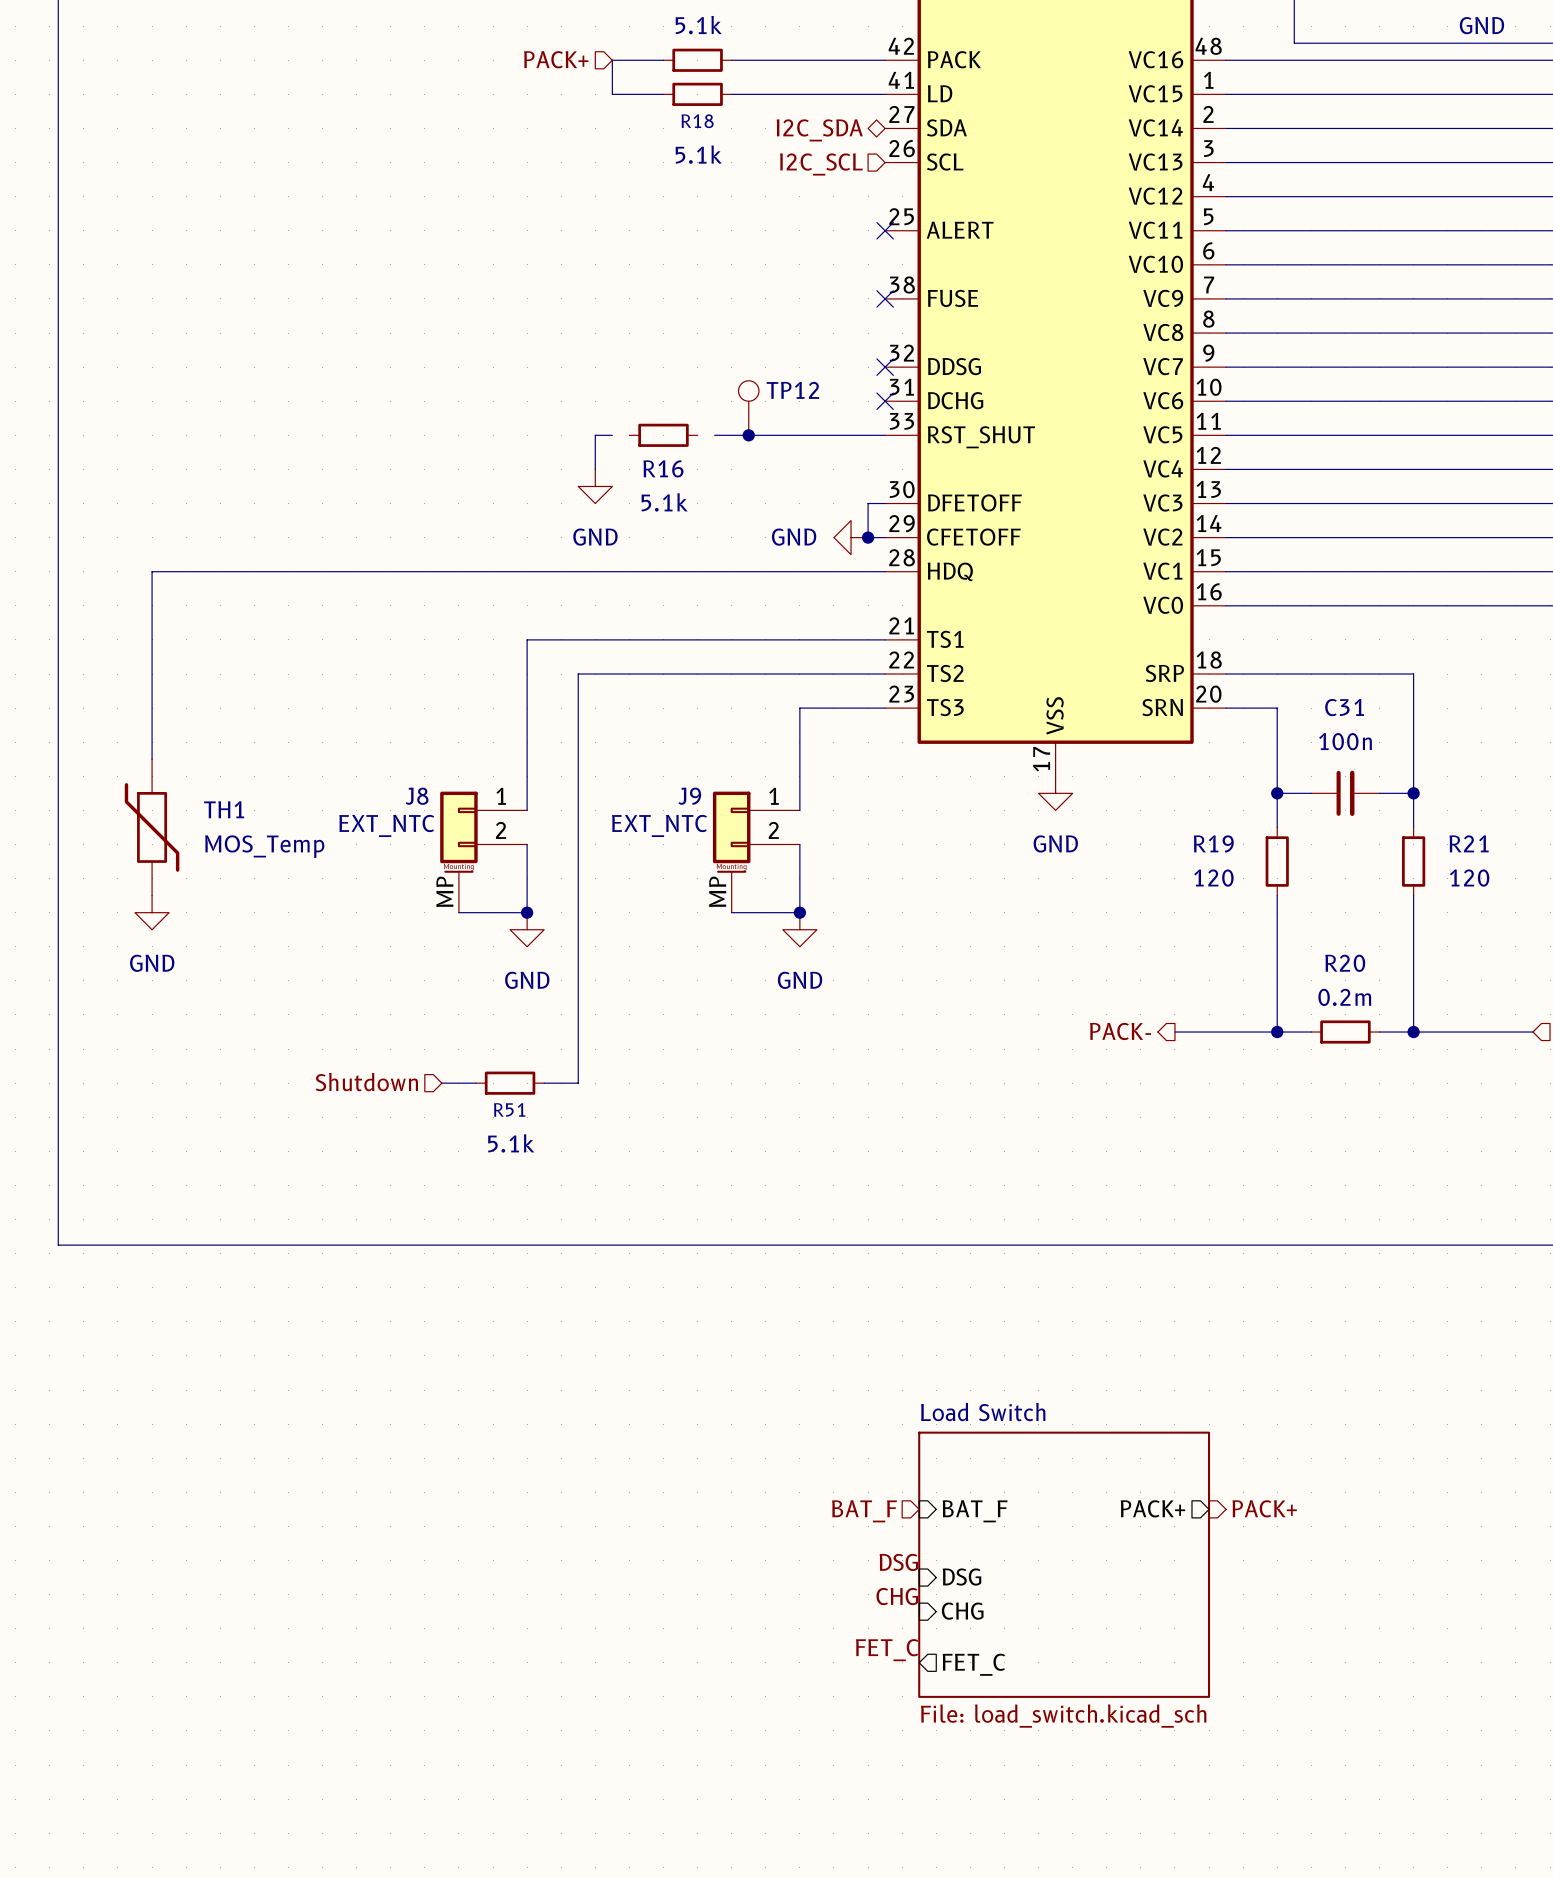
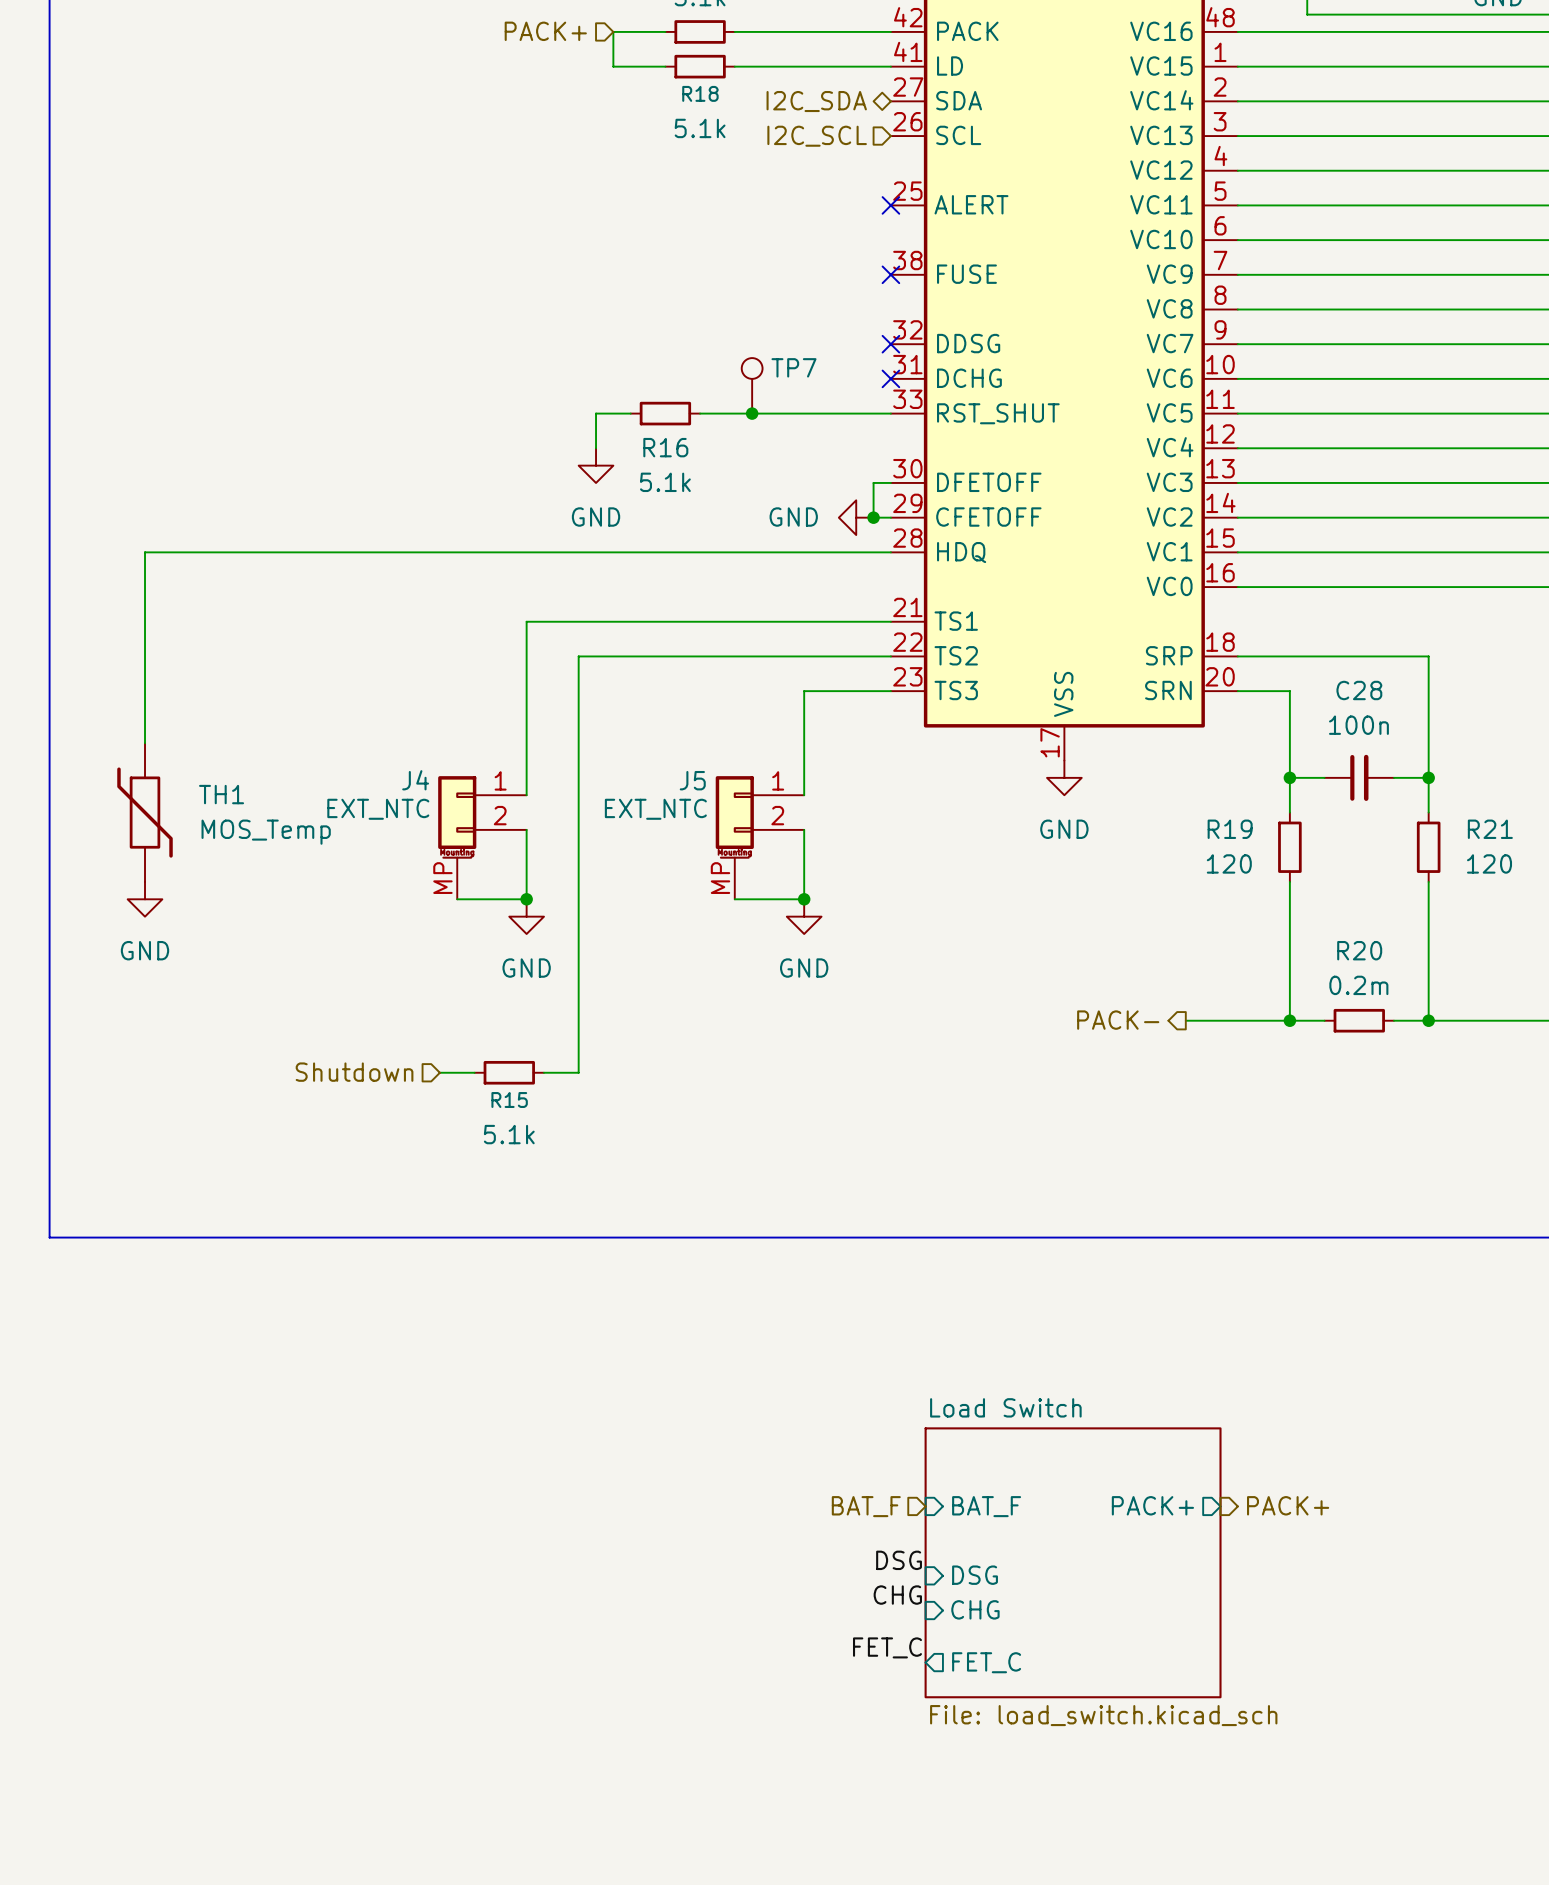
TP12 name: TP12 (792, 390) -> TP7 (793, 367)
wire: none -> (613, 413) (630, 413)
wire: none -> (700, 413) (717, 413)
C31 name: C31 (1344, 707) -> C28 (1359, 690)
J8 name: J8 (417, 796) -> J4 (415, 780)
J9 name: J9 (689, 796) -> J5 (692, 780)
R51 name: R51 (509, 1109) -> R15 (509, 1100)

